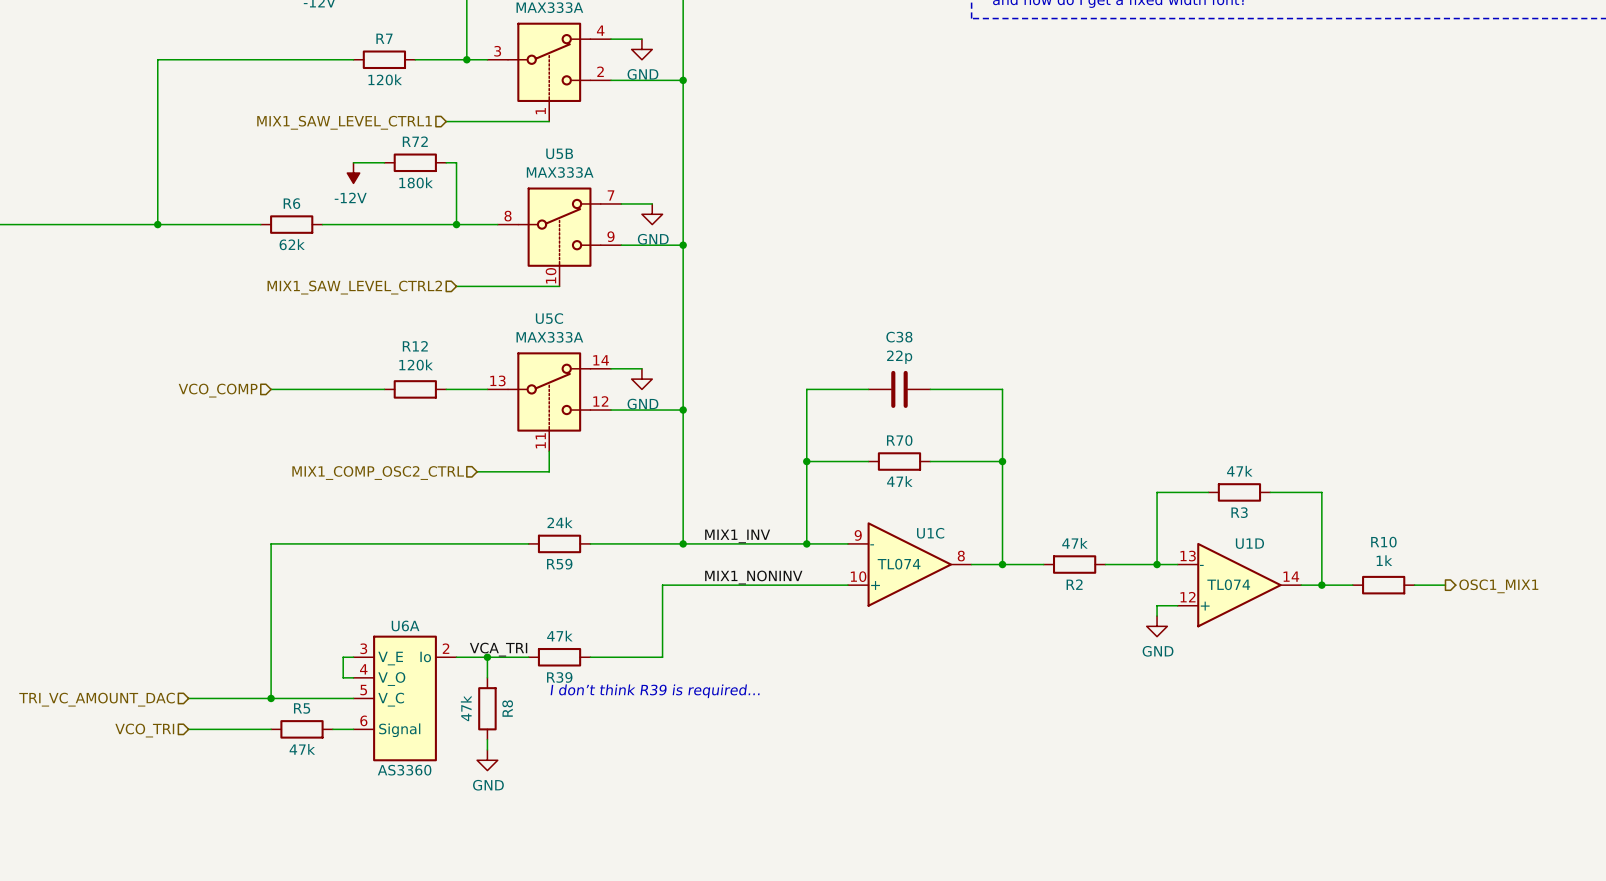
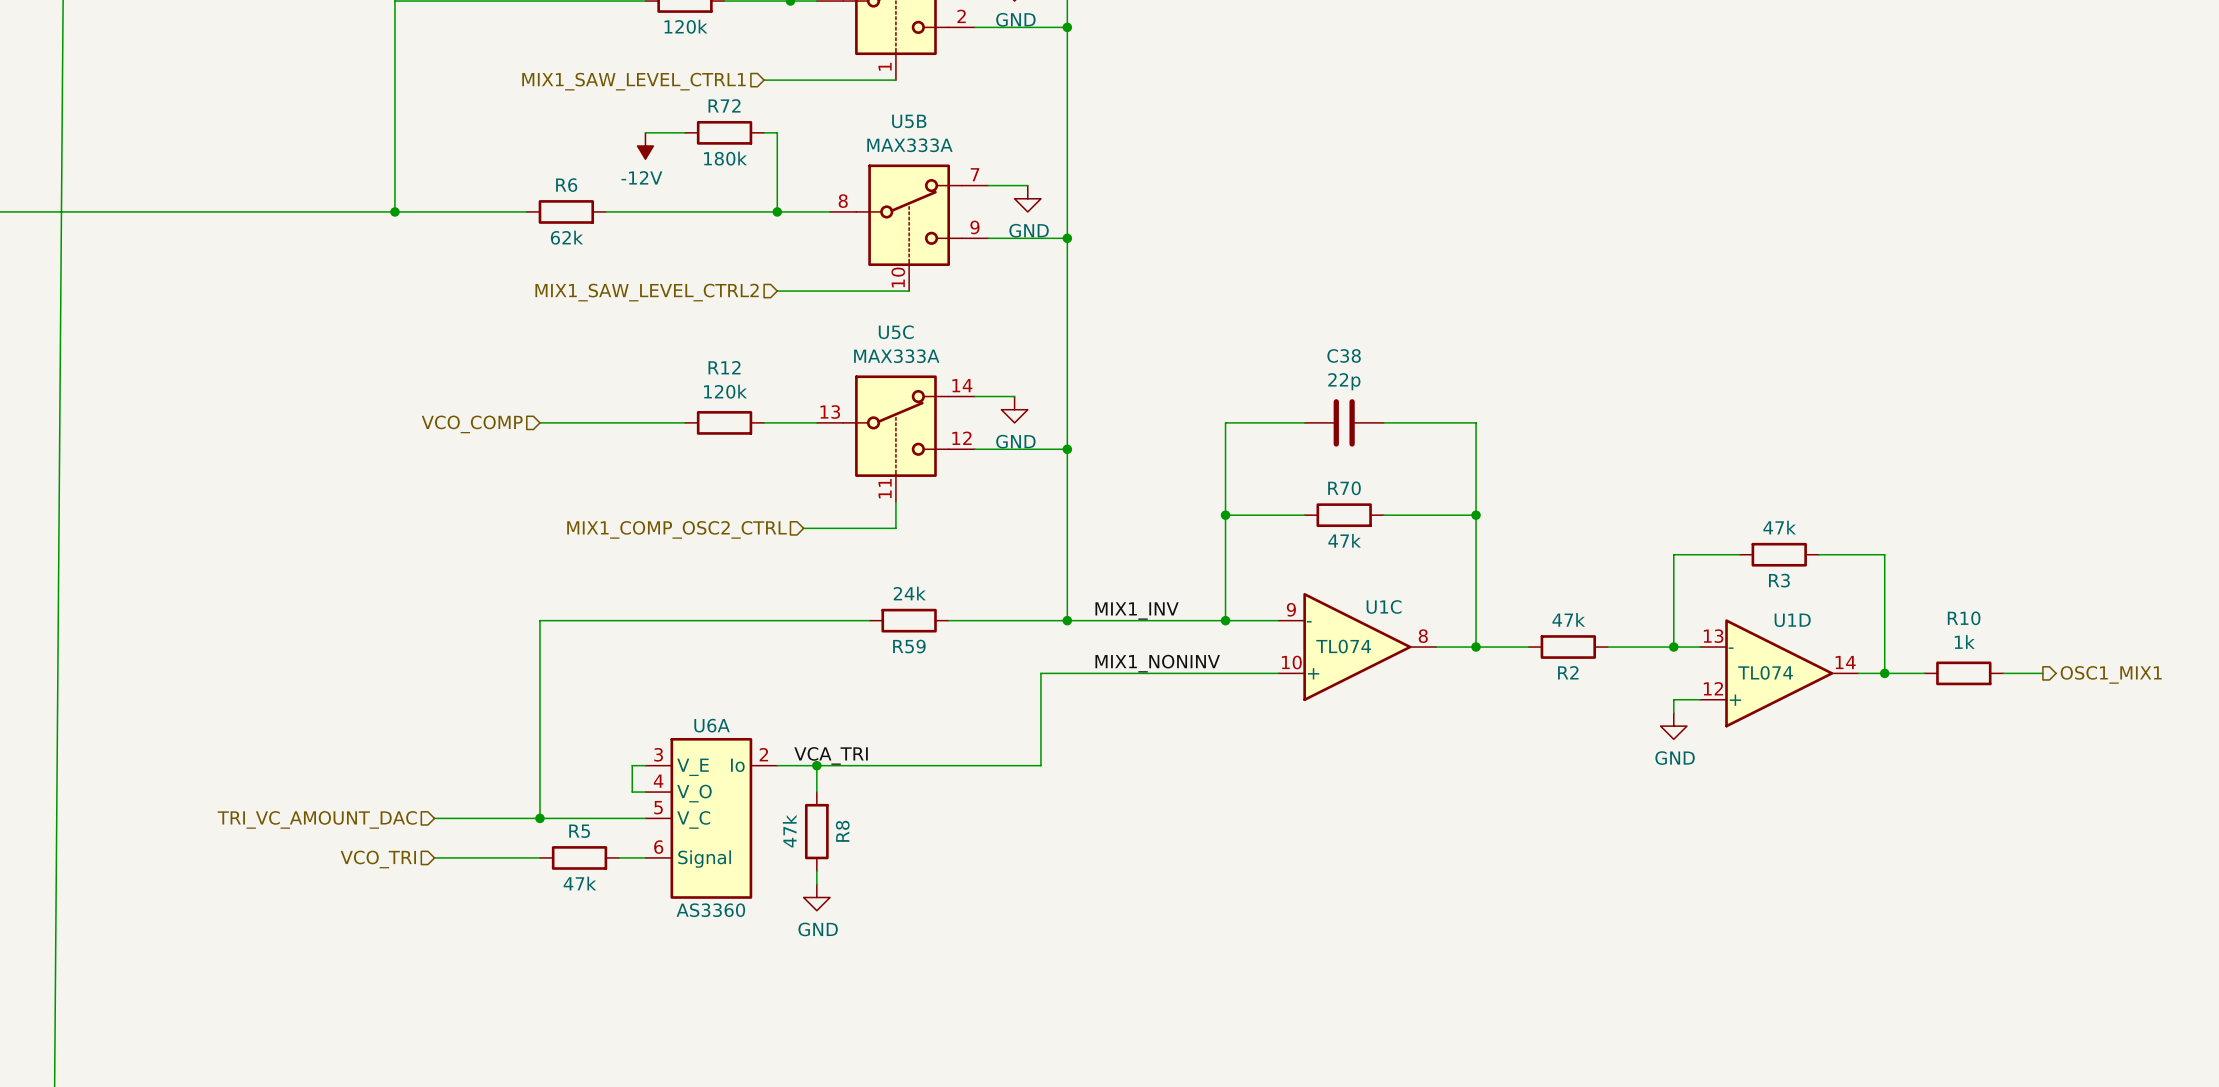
wire: none -> (869, 765) (948, 765)
R39: 47k (559, 657) -> none
text: I don’t think R39 is required… (655, 691) -> none

